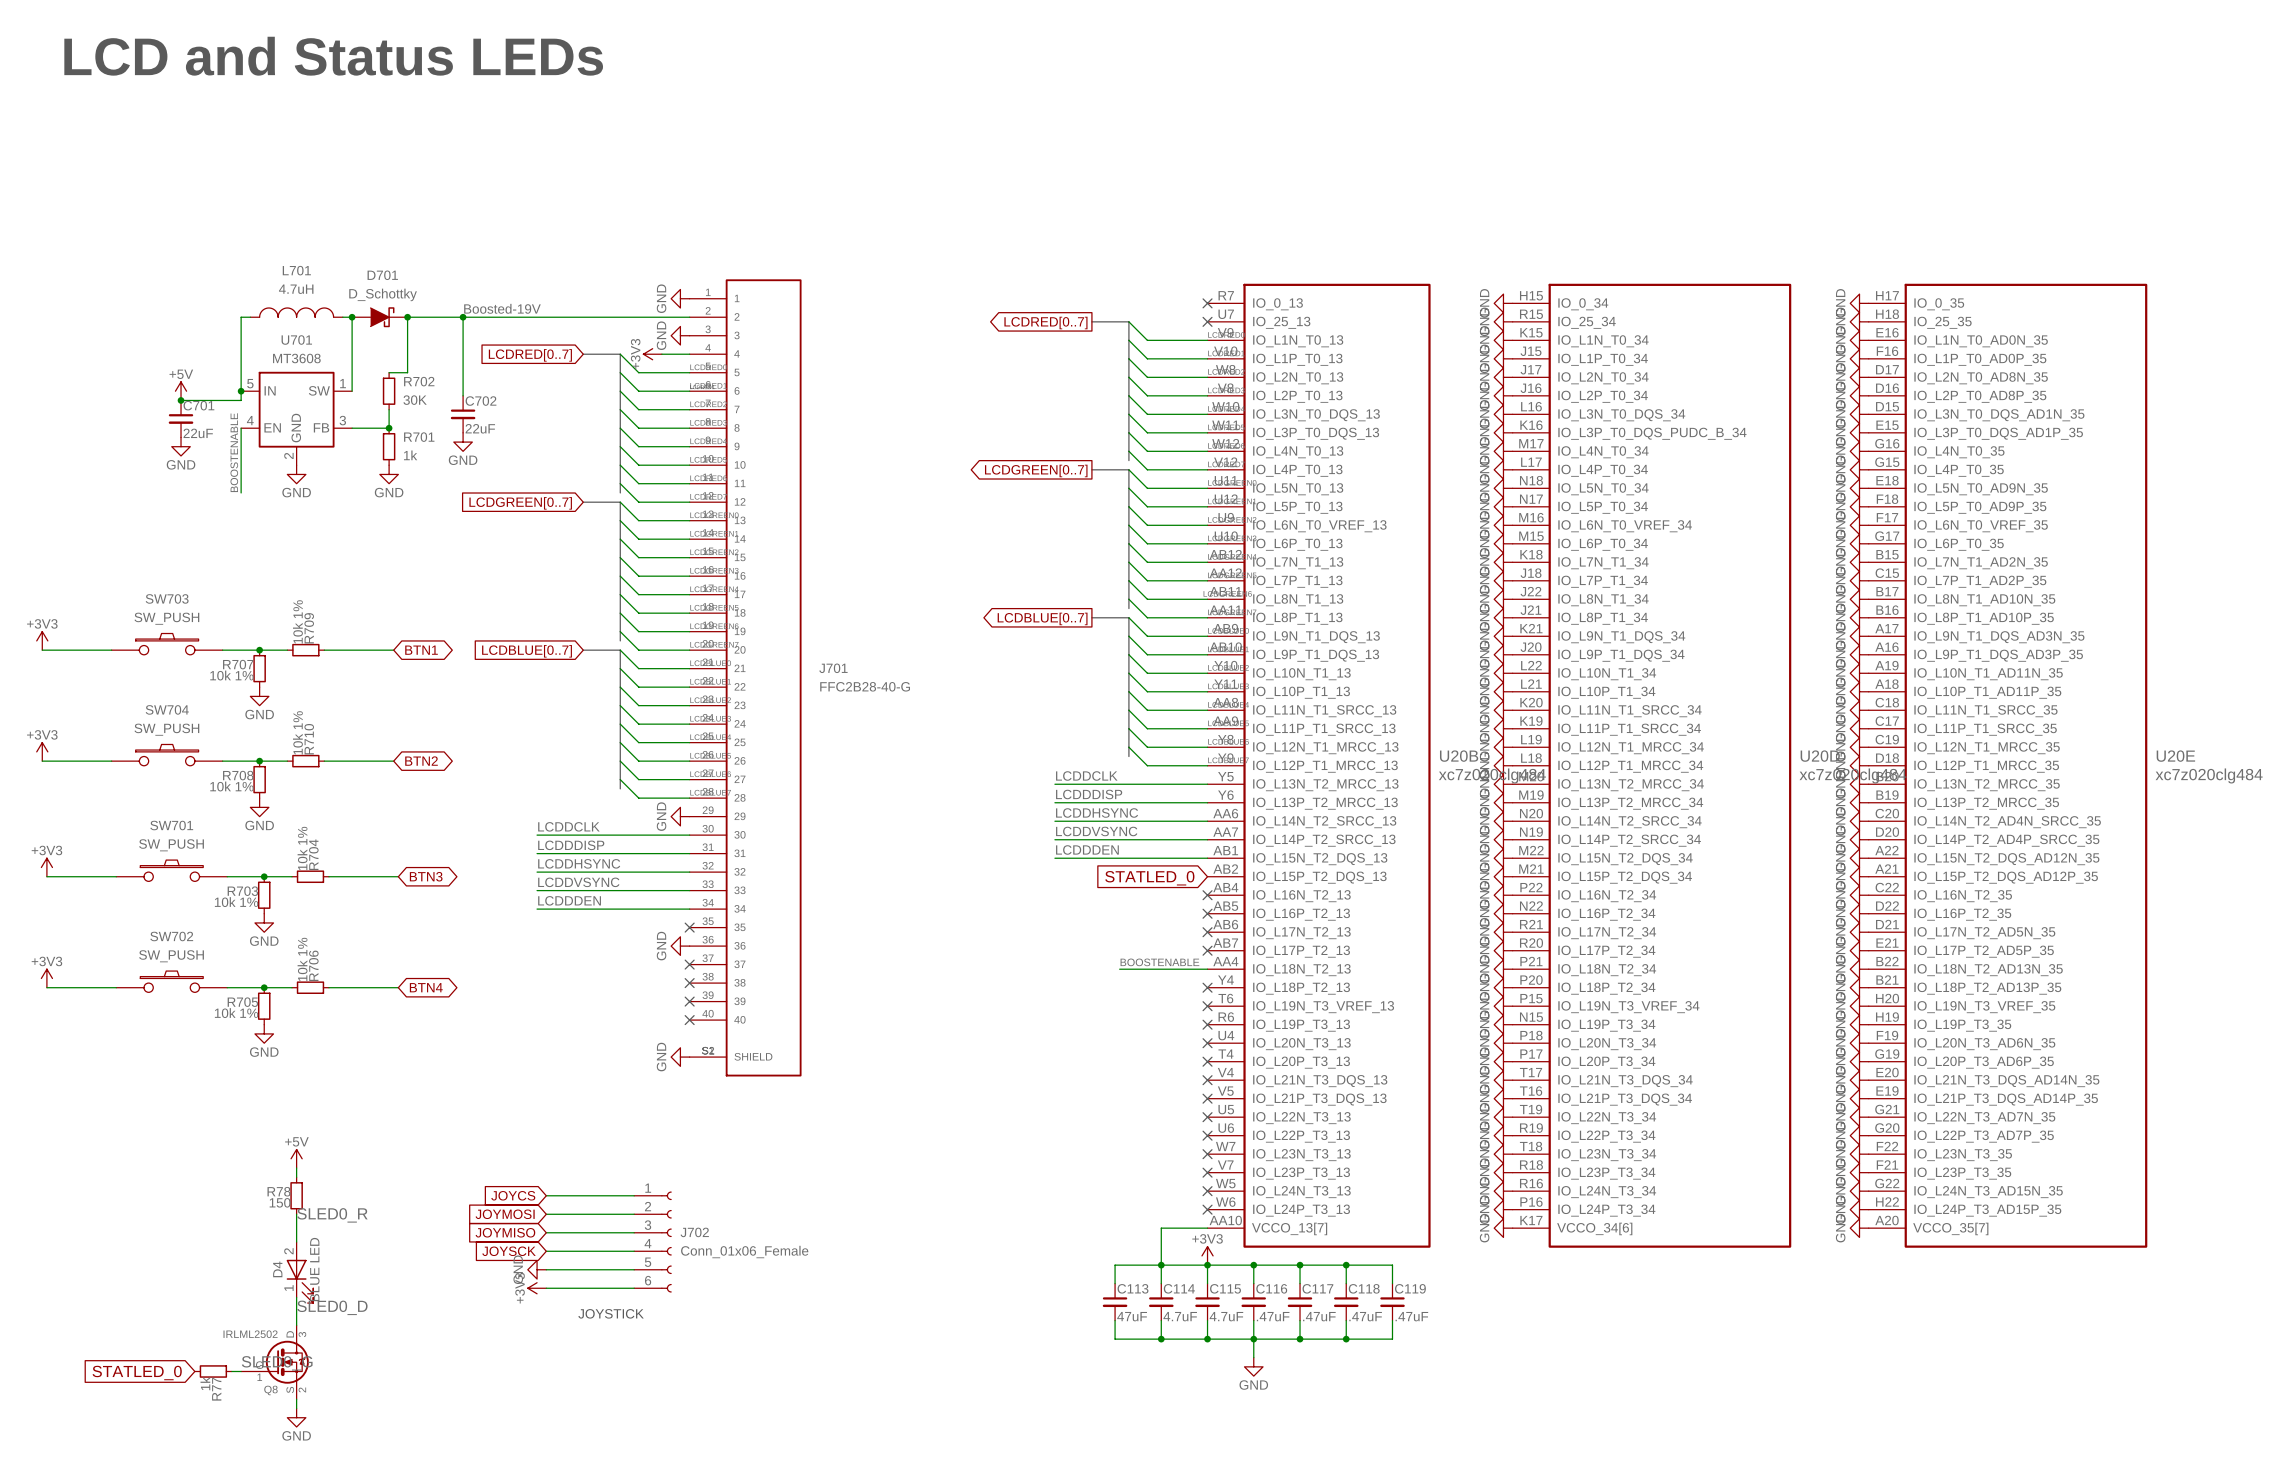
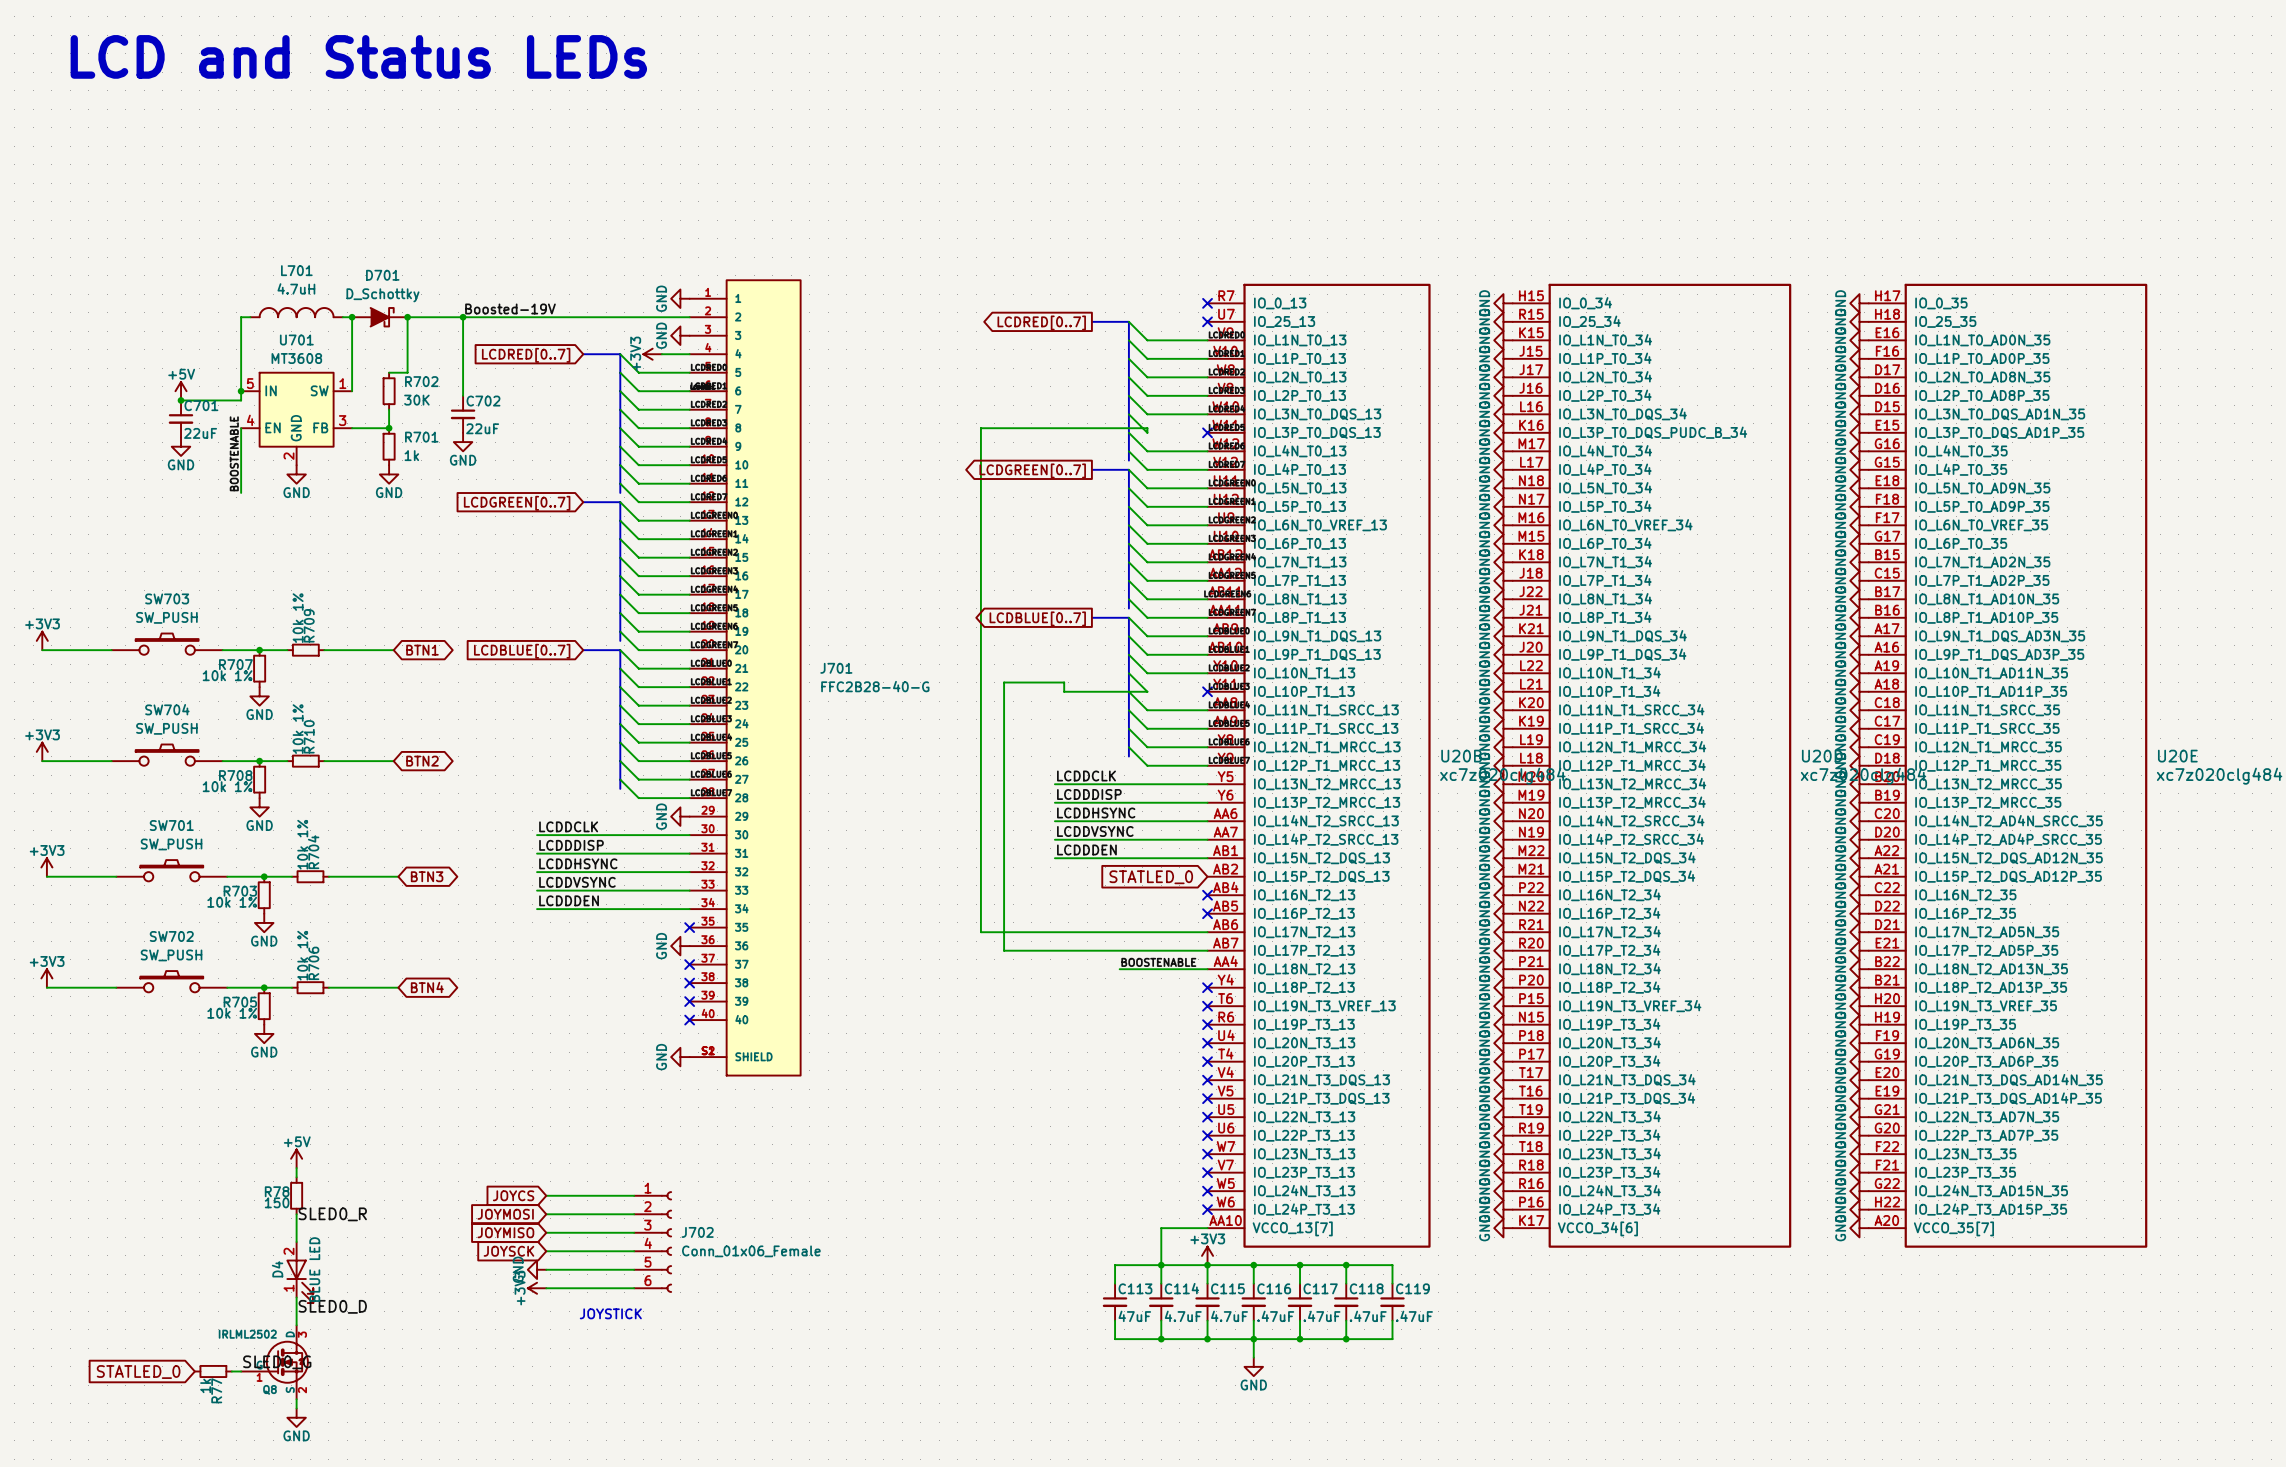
wire: (1147, 432) (1207, 432) -> (1147, 432) (1147, 428) (980, 428) (980, 932) (1207, 932)
no-connect mark: none -> (1207, 432)
wire: (1147, 691) (1207, 691) -> (1147, 691) (1064, 691) (1064, 682) (1004, 682) (1004, 950) (1207, 950)
no-connect mark: none -> (1207, 691)
no-connect mark: (1207, 932) -> none
no-connect mark: (1207, 950) -> none

